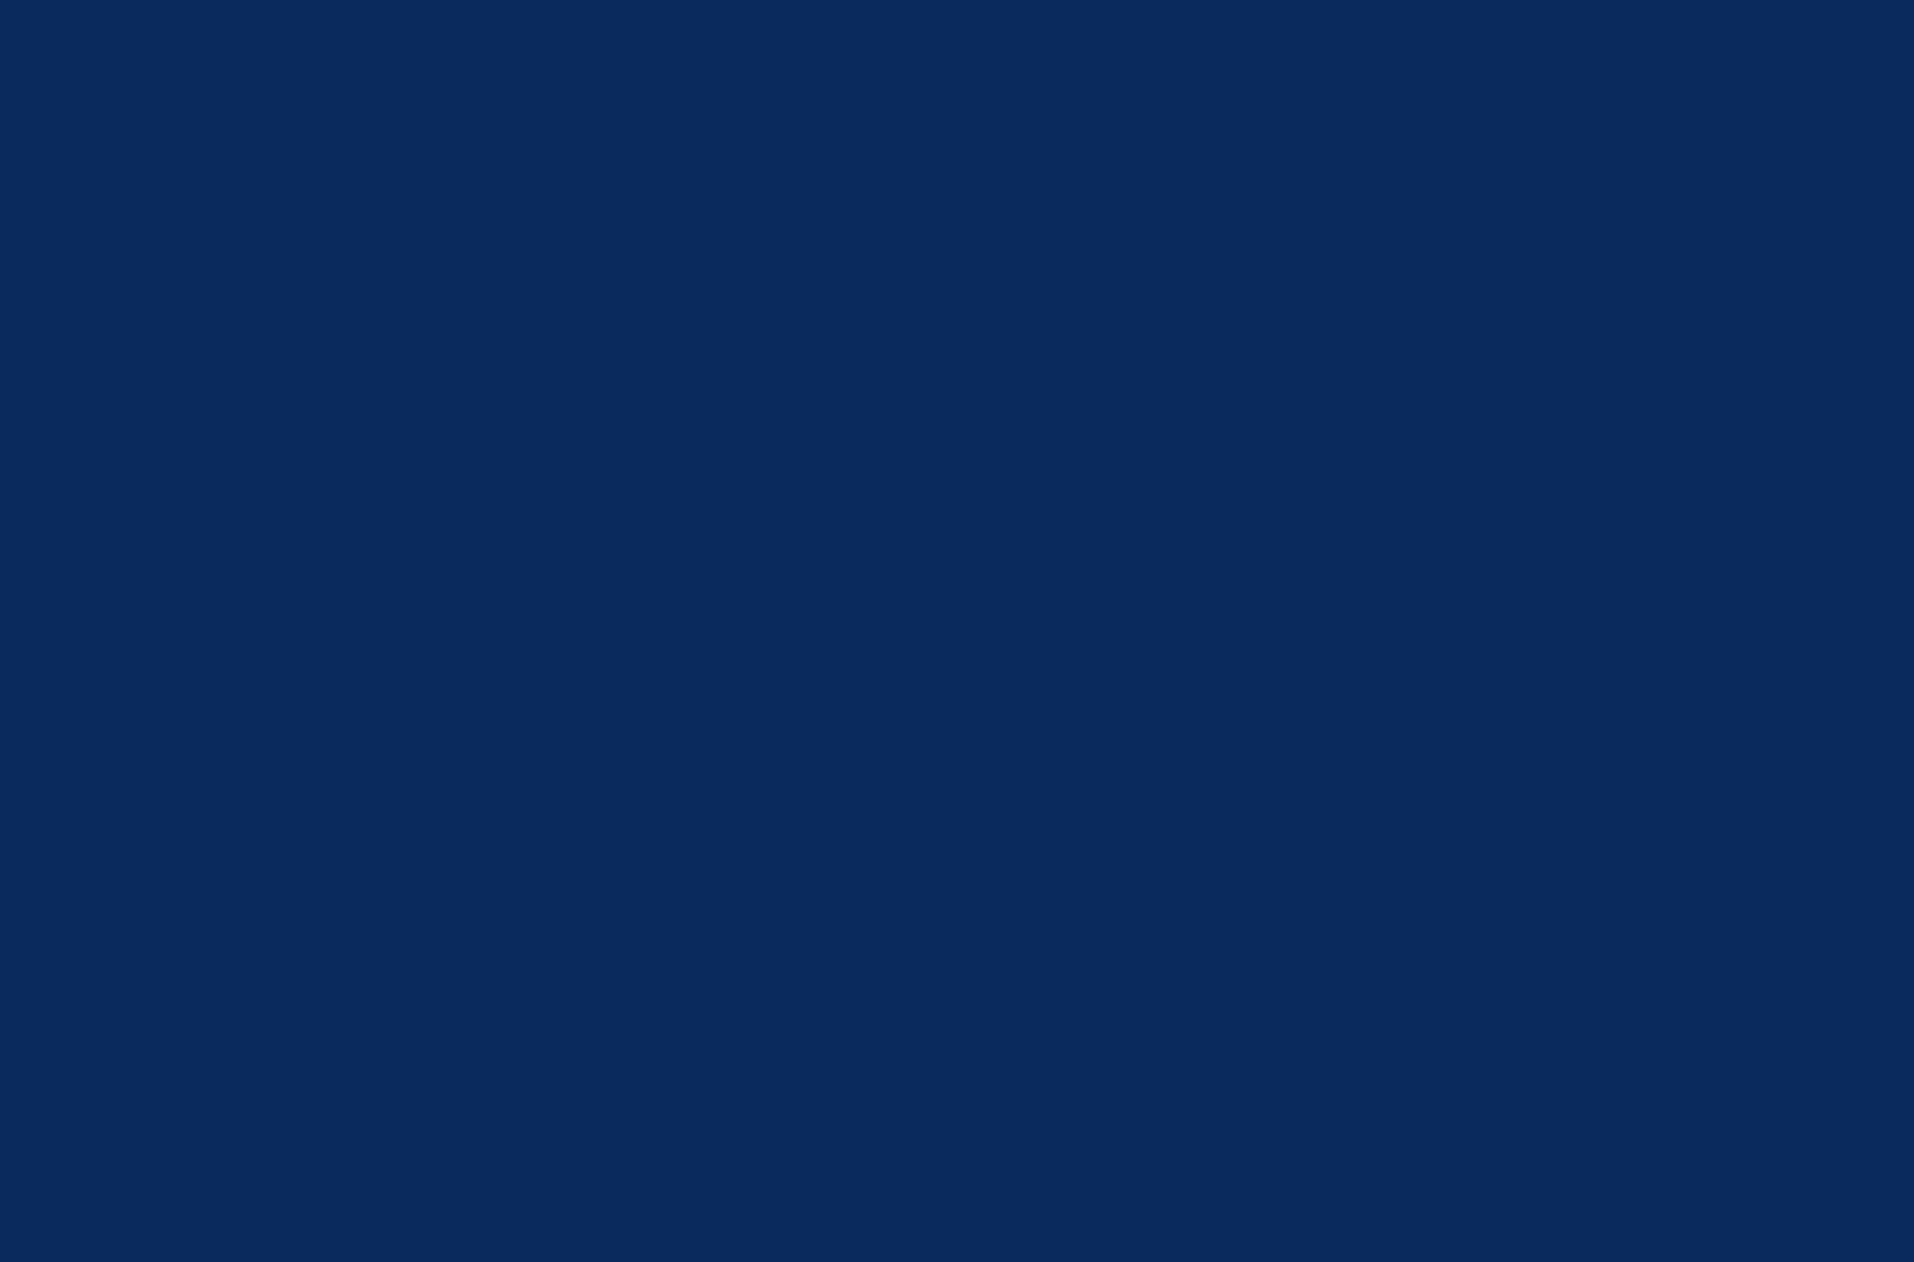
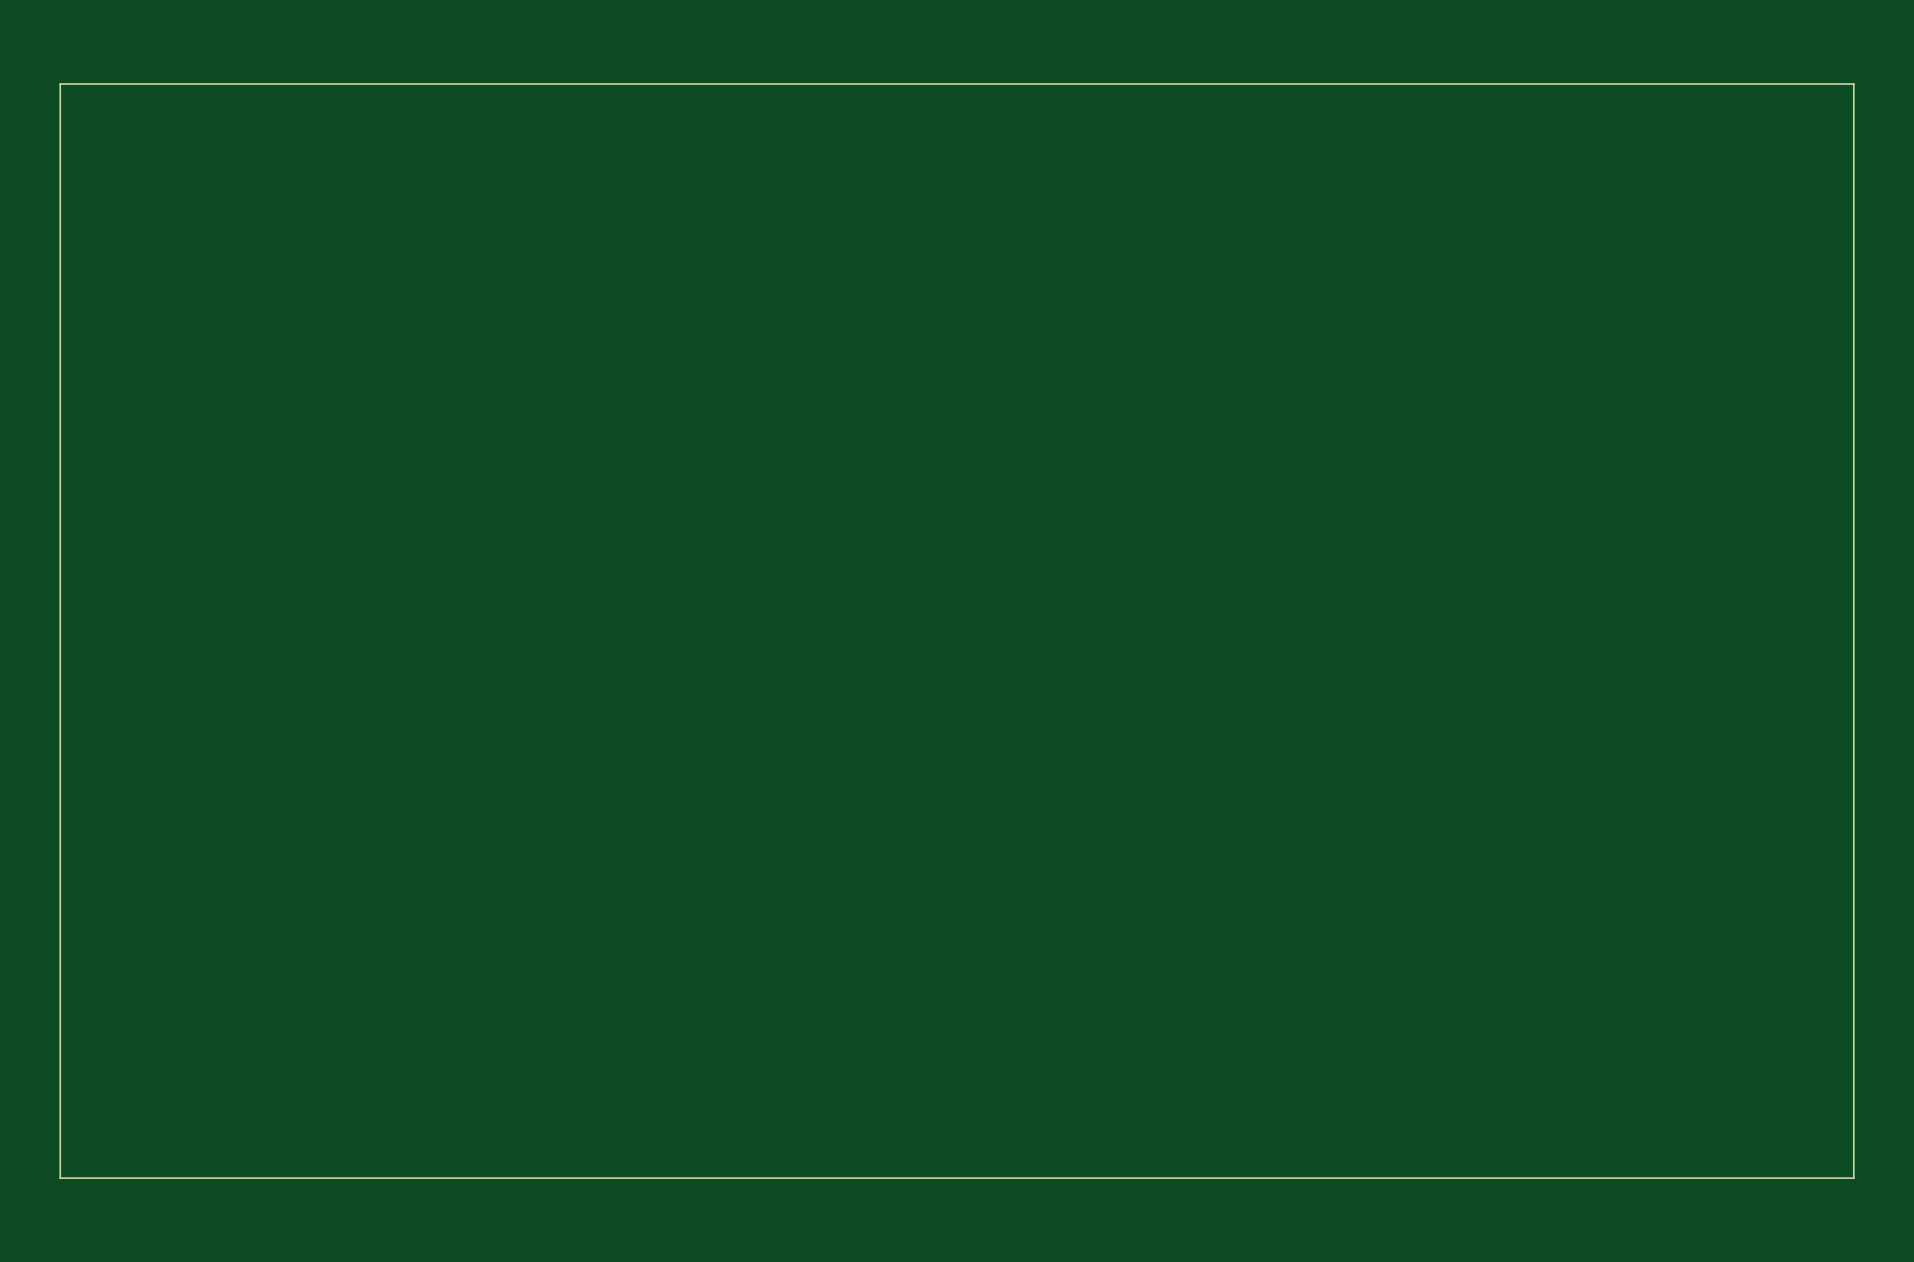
board edge: none -> (60, 84) (60, 1178) (1853, 1178) (1853, 84) (60, 84)

